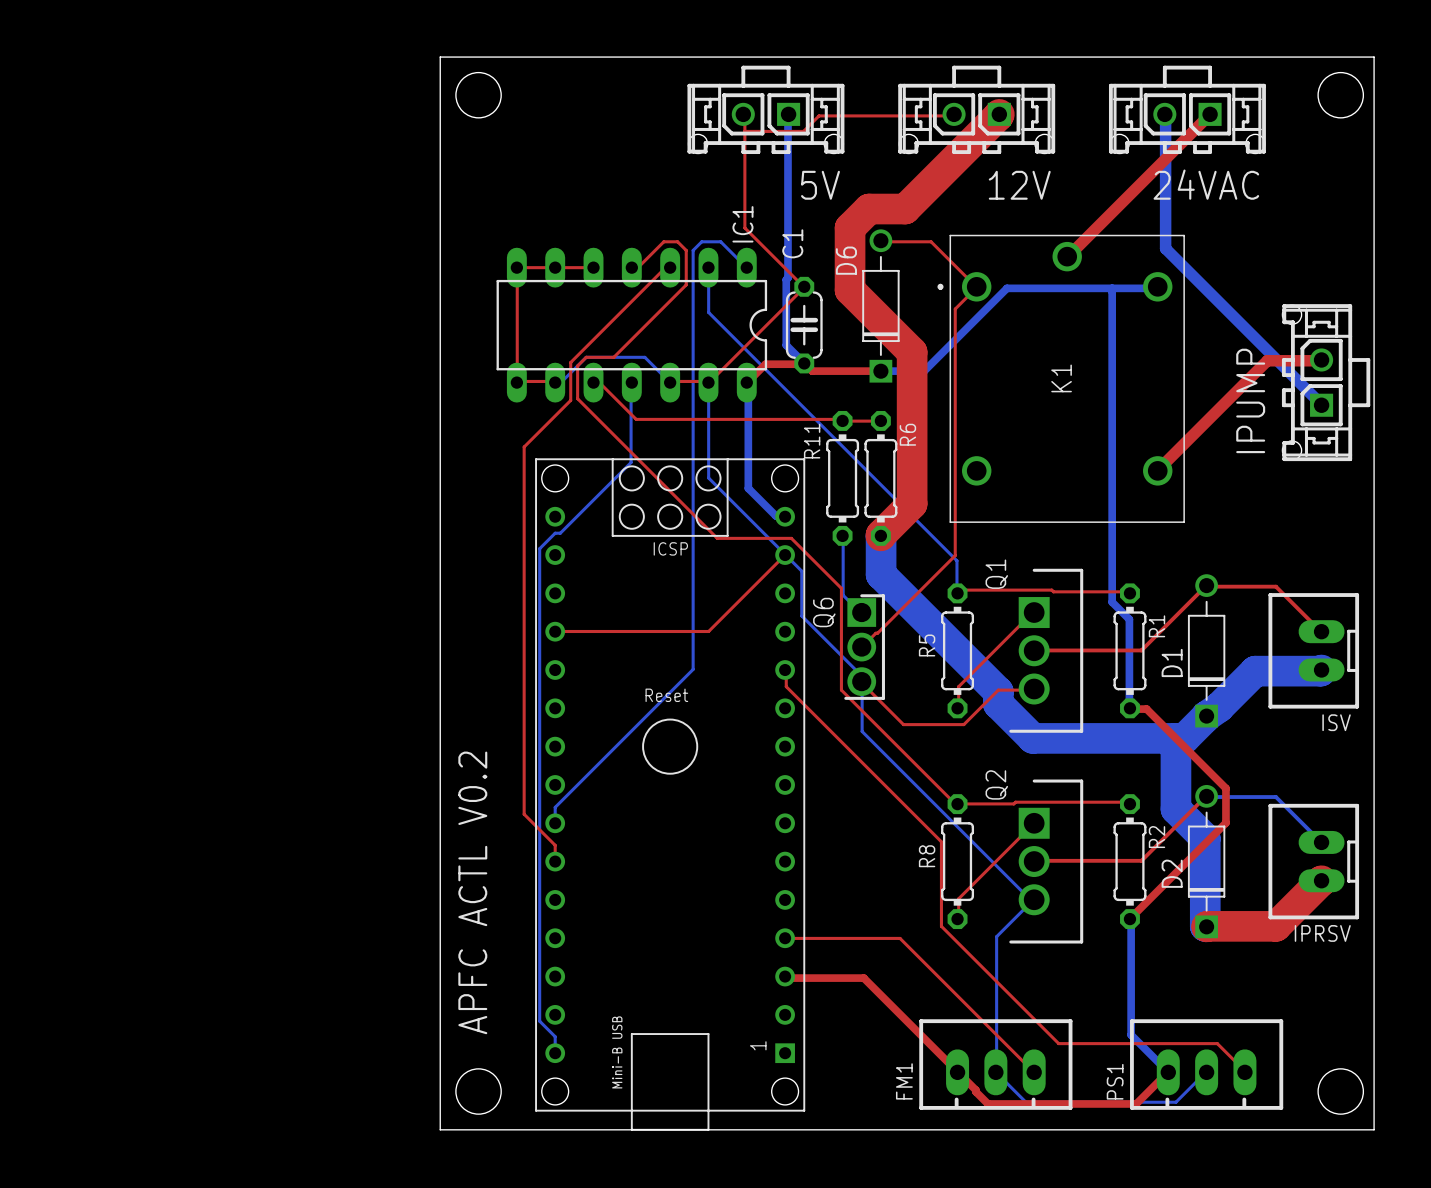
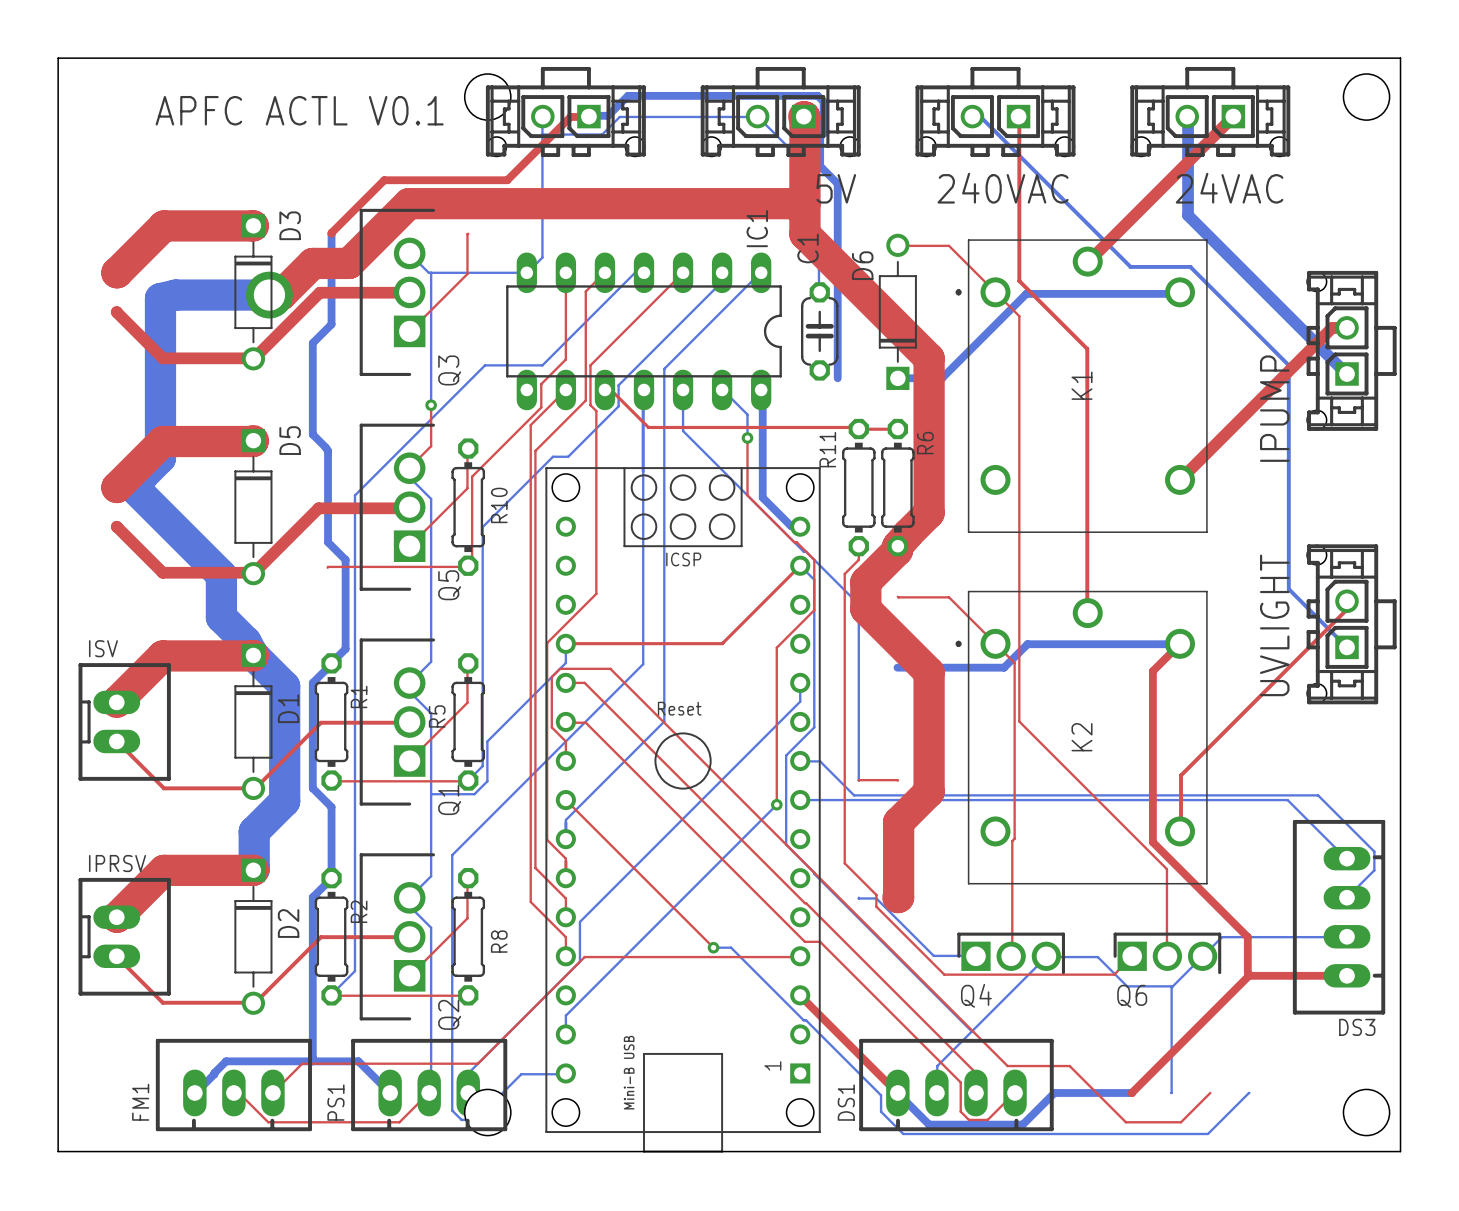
board edge: (440, 57) (440, 1129) -> (448, 58) (58, 58) (58, 1151) (448, 1151)
text: none -> APFC ACTL V0.1 (299, 110)
part: none -> (565, 111)
bottom track: none -> (542, 116) (542, 257) (527, 272) (428, 272) (409, 253)
top track: none -> (588, 116) (570, 116) (507, 180) (384, 180) (331, 233)
bottom track: none -> (588, 116) (608, 115) (627, 95) (817, 95) (823, 101) (823, 133) (820, 136) (820, 166) (837, 183) (837, 378)
top track: (743, 114) (744, 115) (744, 227) (804, 286) (708, 383) (706, 381) (670, 382) -> none
bottom track: (788, 114) (786, 345) (804, 363) -> none
top track: (954, 114) (953, 115) (819, 115) (803, 131) (744, 131) -> none
bottom track: none -> (972, 116) (980, 116) (1130, 266) (1190, 266) (1288, 365) (1288, 589) (1347, 647)
top track: (999, 114) (905, 209) (869, 209) (850, 227) (850, 290) -> (803, 116) (804, 234) (866, 295)
top track: none -> (1018, 116) (1019, 281) (1087, 348) (1087, 613)
bottom track: none -> (542, 134) (602, 134) (619, 116) (757, 116) (818, 177) (819, 292)
text: 12V (1019, 185) -> 240VAC (1003, 188)
top track: none -> (804, 203) (408, 203) (349, 263) (312, 263) (281, 295) (269, 295)
bottom track: (1165, 211) (1165, 248) (1321, 405) -> (1188, 215) (1347, 373)
top track: none -> (253, 225) (163, 225) (116, 272)
bottom track: none -> (331, 233) (331, 324) (312, 343) (312, 434) (328, 450) (328, 542) (345, 559) (345, 648) (312, 682) (312, 788) (331, 807) (331, 878) (312, 897) (312, 1061)
top track: none -> (468, 233) (467, 273) (409, 331)
top track: (880, 240) (931, 241) (976, 286) (955, 309) (955, 555) (861, 647) -> (897, 245) (949, 245) (1019, 316) (1019, 721) (1166, 869) (1167, 956)
bottom track: none -> (431, 272) (431, 405)
top track: (516, 267) (593, 267) -> (565, 917) (565, 898) (535, 868) (535, 450) (585, 400) (585, 291) (604, 272)
top track: (517, 267) (517, 381) (555, 382) -> (565, 956) (565, 937) (530, 902) (530, 425) (565, 389)
top track: none -> (565, 272) (565, 359) (541, 384) (541, 407) (472, 476) (472, 562) (466, 566) (327, 567)
top track: (631, 267) (637, 267) (663, 241) (677, 241) (686, 250) (686, 284) (613, 357) (586, 357) (577, 365) (577, 398) (717, 538) (791, 538) (841, 588) (841, 690) (956, 805) (958, 803) (1013, 803) (1015, 802) (1127, 802) (1129, 804) -> none
bottom track: none -> (643, 272) (635, 272) (542, 365) (485, 365) (354, 495) (354, 971) (331, 995)
top track: (670, 267) (665, 267) (570, 362) (570, 400) (524, 446) (524, 814) (555, 845) -> (683, 272) (590, 365) (590, 405) (596, 411) (596, 593) (547, 643) (547, 839) (565, 858) (565, 861)
bottom track: (708, 267) (708, 312) (956, 560) (957, 593) -> (722, 272) (721, 282) (618, 385) (618, 406) (568, 456) (552, 456) (482, 527) (482, 766) (468, 780)
bottom track: (746, 267) (720, 241) (701, 241) (693, 250) (693, 669) (555, 807) -> (761, 272) (664, 368) (664, 721) (565, 819) (565, 822)
D3: none -> (253, 292)
Q3: none -> (397, 292)
top track: none -> (409, 292) (319, 292) (253, 358) (162, 358) (116, 311)
bottom track: (1112, 288) (1112, 602) (1129, 619) (1129, 708) -> none
bottom track: none -> (269, 295) (175, 295) (160, 298) (160, 457) (142, 475) (134, 488) (221, 575) (221, 617) (246, 641) (253, 655) (284, 686) (284, 801) (254, 831) (253, 870)
via: none -> (269, 295)
top track: (911, 351) (912, 503) (880, 535) -> (929, 358) (929, 513) (908, 534) (897, 546) (897, 550) (865, 582) (865, 609) (929, 672) (929, 791) (898, 822) (897, 897)
top track: (1321, 359) (1267, 360) (1157, 470) -> (1347, 327) (1332, 327) (1180, 479)
top track: (880, 371) (812, 371) (804, 363) (765, 364) (746, 382) -> none
bottom track: (555, 382) (562, 381) (586, 357) (644, 357) (670, 382) -> (858, 780) (858, 604) (683, 430) (683, 389)
bottom track: (708, 382) (708, 478) (801, 571) (801, 615) (860, 674) (862, 731) (1031, 900) (1034, 899) (996, 936) (995, 1072) (1025, 1102) (1175, 1102) (1206, 1072) -> (722, 389) (747, 414) (747, 438)
part position: (1326, 382) -> (1351, 350)
top track: none -> (431, 405) (431, 446) (409, 468)
via: none -> (431, 405)
top track: none -> (747, 438) (747, 495) (814, 559) (814, 610) (776, 647) (776, 804)
via: none -> (747, 438)
top track: none -> (253, 440) (162, 441) (116, 487)
top track: none -> (468, 448) (467, 488) (409, 546)
bottom track: none -> (409, 468) (410, 477) (431, 498) (431, 661) (409, 683) (410, 692) (431, 713) (431, 876) (409, 897) (410, 906) (431, 927) (431, 1091) (429, 1092)
bottom track: (631, 462) (560, 533) (555, 533) (539, 548) (539, 1021) (555, 1036) (555, 1053) -> (643, 471) (643, 664) (452, 855) (452, 1110) (461, 1119) (475, 1119) (521, 1074) (565, 1073)
D5: none -> (253, 507)
Q5: none -> (397, 507)
top track: none -> (409, 507) (318, 508) (253, 573) (162, 572) (116, 526)
R10: none -> (468, 507)
top track: none -> (858, 546) (858, 559) (844, 573) (844, 863) (876, 894) (876, 906) (944, 974) (1114, 974) (1132, 956)
bottom track: (842, 535) (843, 595) (861, 612) -> none
bottom track: (880, 535) (881, 574) (998, 691) (998, 703) (1032, 738) (1184, 738) (1255, 671) (1321, 670) -> none
bottom track: none -> (800, 565) (814, 579) (814, 727) (786, 755) (786, 844) (971, 1031)
top track: none -> (897, 596) (949, 597) (1014, 662) (1014, 838) (1012, 841) (1011, 956)
top track: none -> (1347, 601) (1346, 610) (1181, 775) (1180, 831)
top track: (957, 593) (960, 590) (1051, 590) (1053, 591) (1129, 591) (1129, 593) -> none
top track: (1034, 612) (958, 686) (957, 708) -> none
part: none -> (1351, 624)
text: none -> UVLIGHT (1274, 625)
bottom track: none -> (565, 643) (565, 662) (487, 741) (487, 781) (474, 794) (431, 794)
top track: none -> (1180, 643) (1152, 671) (1152, 842) (1247, 937) (1248, 975)
bottom track: none -> (1180, 643) (1027, 644) (1004, 667) (897, 667)
top track: (1321, 631) (1275, 586) (1206, 585) (1141, 650) (1034, 650) -> none
top track: none -> (253, 655) (162, 655) (116, 702)
Q6 rotation: 0° (864, 647) -> 90° counterclockwise (1167, 953)
Q6 position: (864, 647) -> (1167, 953)
top track: none -> (468, 663) (467, 702) (409, 761)
R5 position: (957, 650) -> (468, 721)
Q1 rotation: 0° (1046, 650) -> 180° (397, 722)
Q1 position: (1046, 650) -> (397, 722)
R1 position: (1129, 650) -> (331, 721)
D1 rotation: 0° (1206, 650) -> 180° (253, 721)
D1 position: (1206, 650) -> (253, 721)
ISV: (1313, 650) -> none
top track: none -> (565, 682) (584, 682) (975, 1073) (975, 1092)
top track: (785, 670) (786, 686) (941, 841) (941, 926) (1058, 1043) (1217, 1043) (1244, 1072) -> none
bottom track: none -> (800, 682) (800, 701) (579, 921) (579, 961) (468, 1073) (468, 1092)
top track: (861, 681) (903, 724) (963, 724) (998, 690) (1034, 689) -> none
ISV: none -> (124, 721)
top track: none -> (409, 722) (321, 722) (255, 788) (163, 788) (116, 741)
top track: none -> (565, 721) (585, 722) (804, 941) (820, 941) (960, 1082) (960, 1111) (968, 1119) (987, 1119) (1015, 1092)
top track: (1129, 708) (1146, 709) (1225, 788) (1225, 822) (1129, 919) -> none
K2: none -> (1081, 737)
bottom track: (1175, 738) (1175, 809) (1205, 838) (1206, 926) -> none
top track: none -> (565, 761) (565, 741) (551, 727) (551, 677) (560, 668) (610, 668) (1007, 1066) (1069, 1066) (1125, 1122) (1181, 1122) (1210, 1092)
bottom track: none -> (800, 761) (820, 761) (854, 795) (1318, 795) (1374, 851) (1374, 870) (1347, 897)
top track: none -> (331, 780) (468, 780)
top track: none -> (858, 780) (897, 780)
top track: none -> (565, 800) (713, 947)
bottom track: none -> (776, 804) (565, 1015) (565, 1034)
via: none -> (776, 804)
top track: (1206, 796) (1141, 860) (1034, 861) -> none
bottom track: (1206, 796) (1275, 797) (1321, 842) -> (800, 800) (1287, 800) (1347, 858)
top track: (1034, 823) (958, 898) (957, 919) -> none
top track: none -> (253, 870) (163, 870) (116, 917)
R8 name position: R8 (927, 856) -> R8 (499, 941)
top track: none -> (468, 878) (467, 918) (409, 975)
R8 position: (957, 861) -> (468, 936)
Q2 rotation: 0° (1046, 861) -> 180° (397, 936)
Q2 position: (1046, 861) -> (397, 936)
R2 position: (1129, 861) -> (331, 936)
D2 rotation: 0° (1206, 861) -> 180° (253, 936)
D2 position: (1206, 861) -> (253, 936)
IPRSV: (1313, 861) -> none
bottom track: none -> (858, 897) (876, 898) (933, 955) (975, 956)
top track: (1321, 880) (1275, 926) (1206, 926) -> none
text: APFC ACTL V0.2 (472, 892) -> none
DS3: none -> (1339, 917)
IPRSV: none -> (124, 936)
top track: none -> (409, 936) (321, 937) (253, 1003) (162, 1002) (116, 956)
bottom track: (1129, 919) (1131, 1034) (1168, 1072) -> none
bottom track: none -> (1347, 936) (1222, 937) (1171, 987) (1171, 1092)
bottom track: none -> (713, 947) (731, 947) (803, 1020) (806, 1020) (881, 1095) (881, 1111) (903, 1133) (1207, 1133) (1249, 1092)
via: none -> (713, 947)
Q4: none -> (1011, 953)
top track: (785, 938) (900, 938) (1034, 1072) -> (800, 956) (584, 957) (478, 1063) (302, 1063) (272, 1092)
top track: none -> (1248, 975) (1347, 975)
top track: none -> (1248, 975) (1132, 1092)
bottom track: none -> (1172, 986) (1127, 986) (1097, 957) (1046, 956) (937, 1066) (936, 1092)
top track: none -> (331, 995) (468, 995)
top track: (785, 976) (786, 978) (863, 978) (988, 1103) (1136, 1103) (1168, 1072) -> (800, 995) (897, 1092)
DS1: none -> (956, 1085)
FM1 position: (995, 1064) -> (233, 1085)
PS1 position: (1206, 1064) -> (429, 1085)
bottom track: none -> (194, 1092) (226, 1061) (358, 1061) (390, 1092)
top track: none -> (233, 1092) (238, 1092) (268, 1122) (399, 1122) (429, 1092)
bottom track: none -> (897, 1092) (929, 1124) (1022, 1124) (1054, 1092) (1132, 1092)

